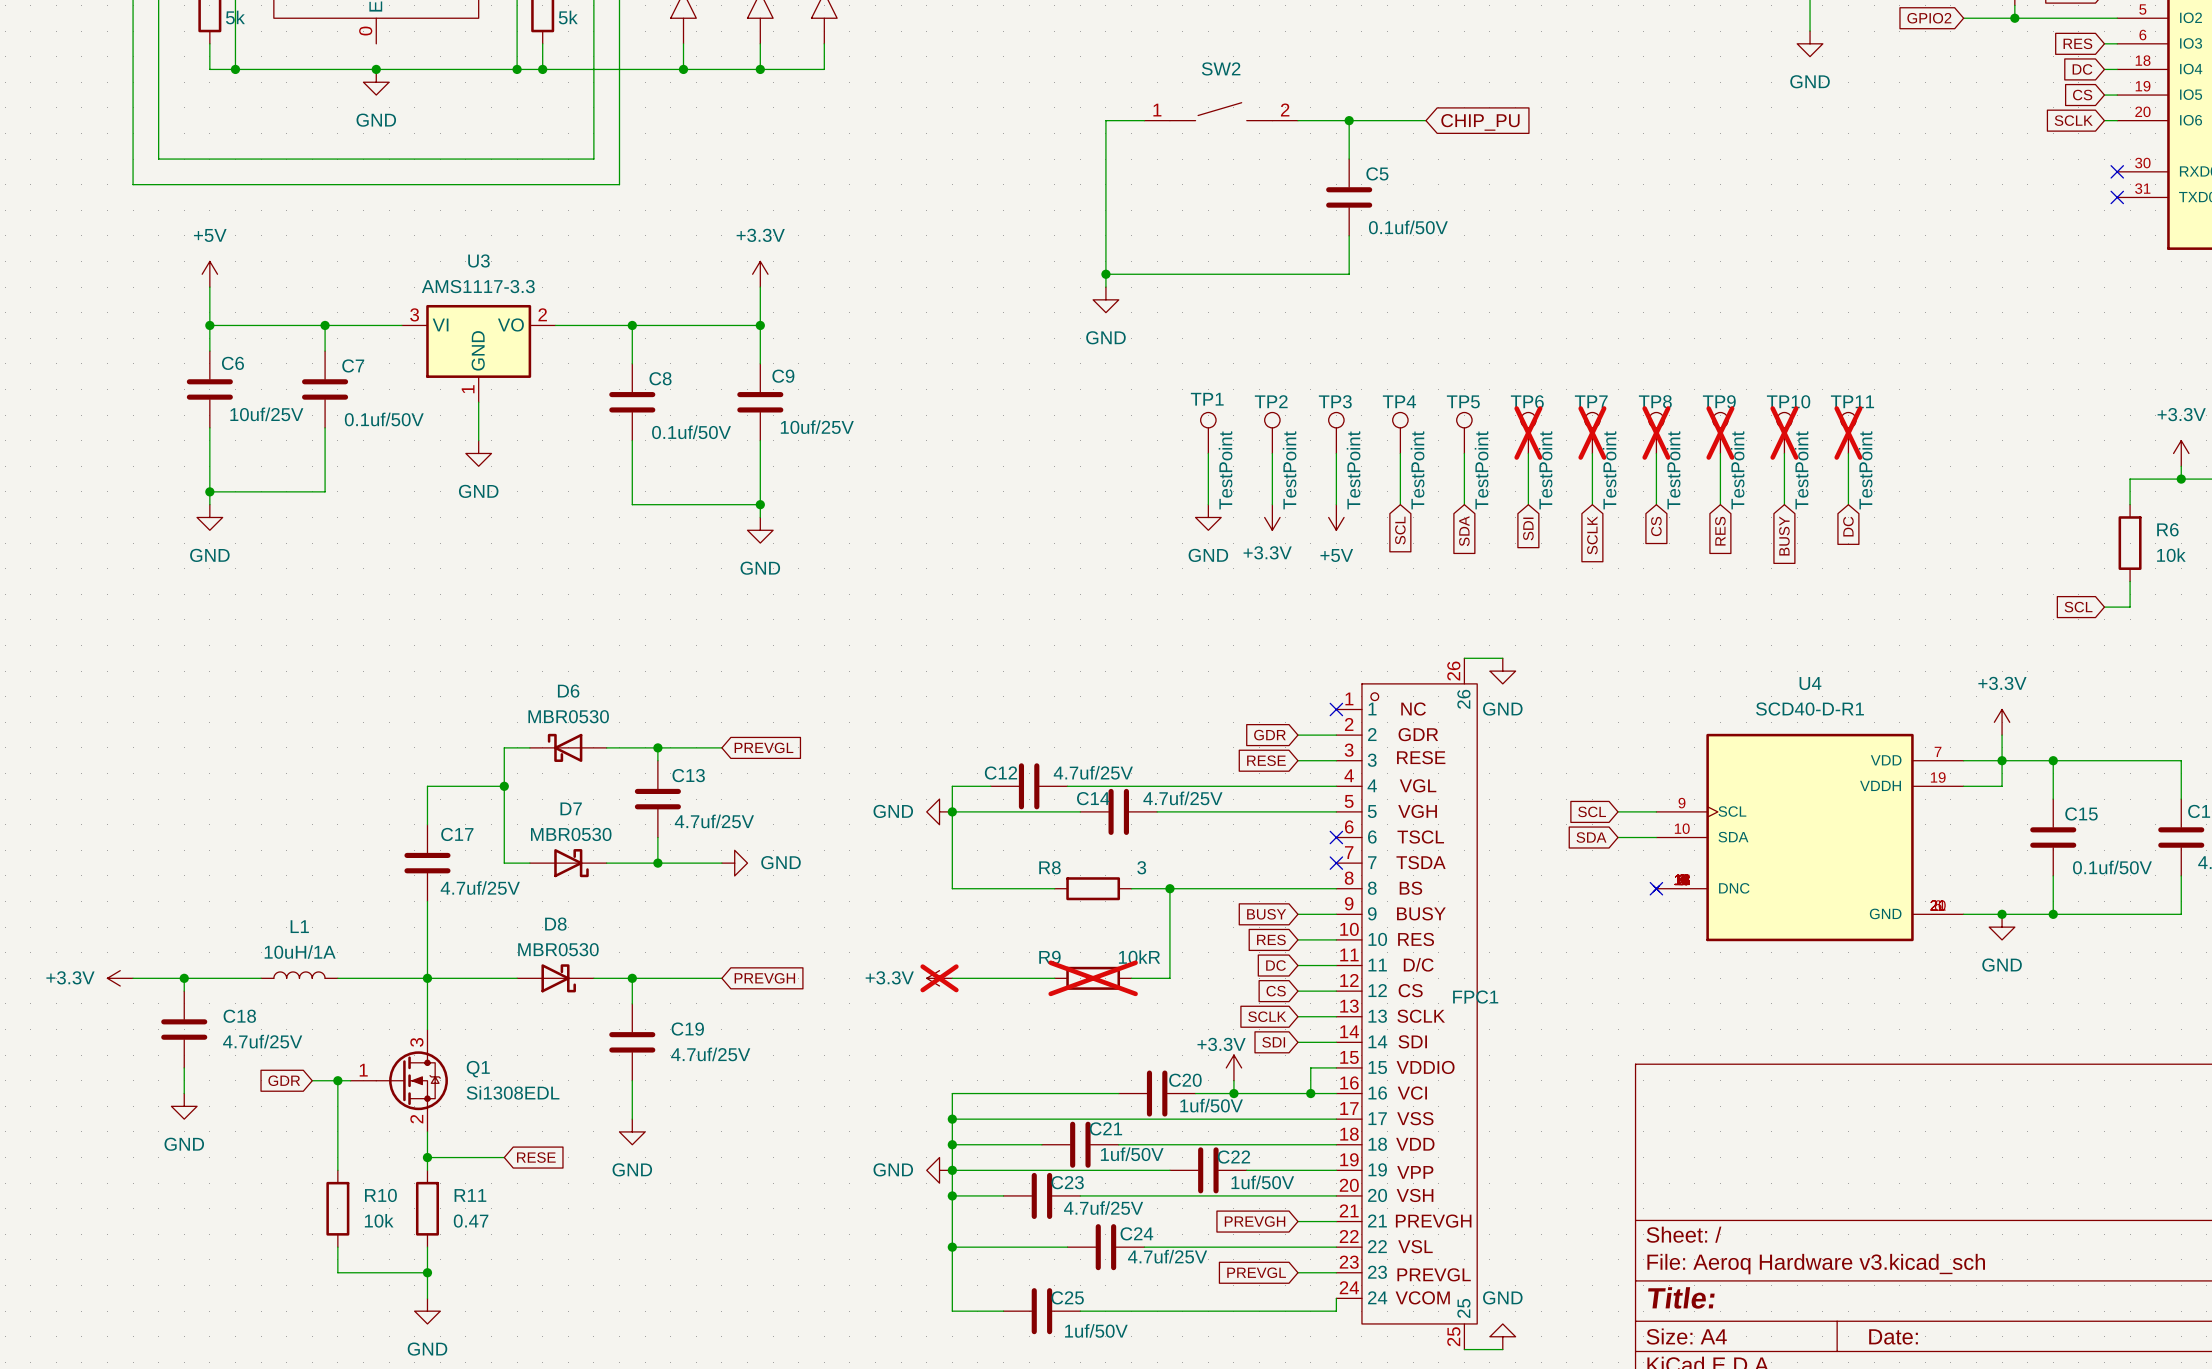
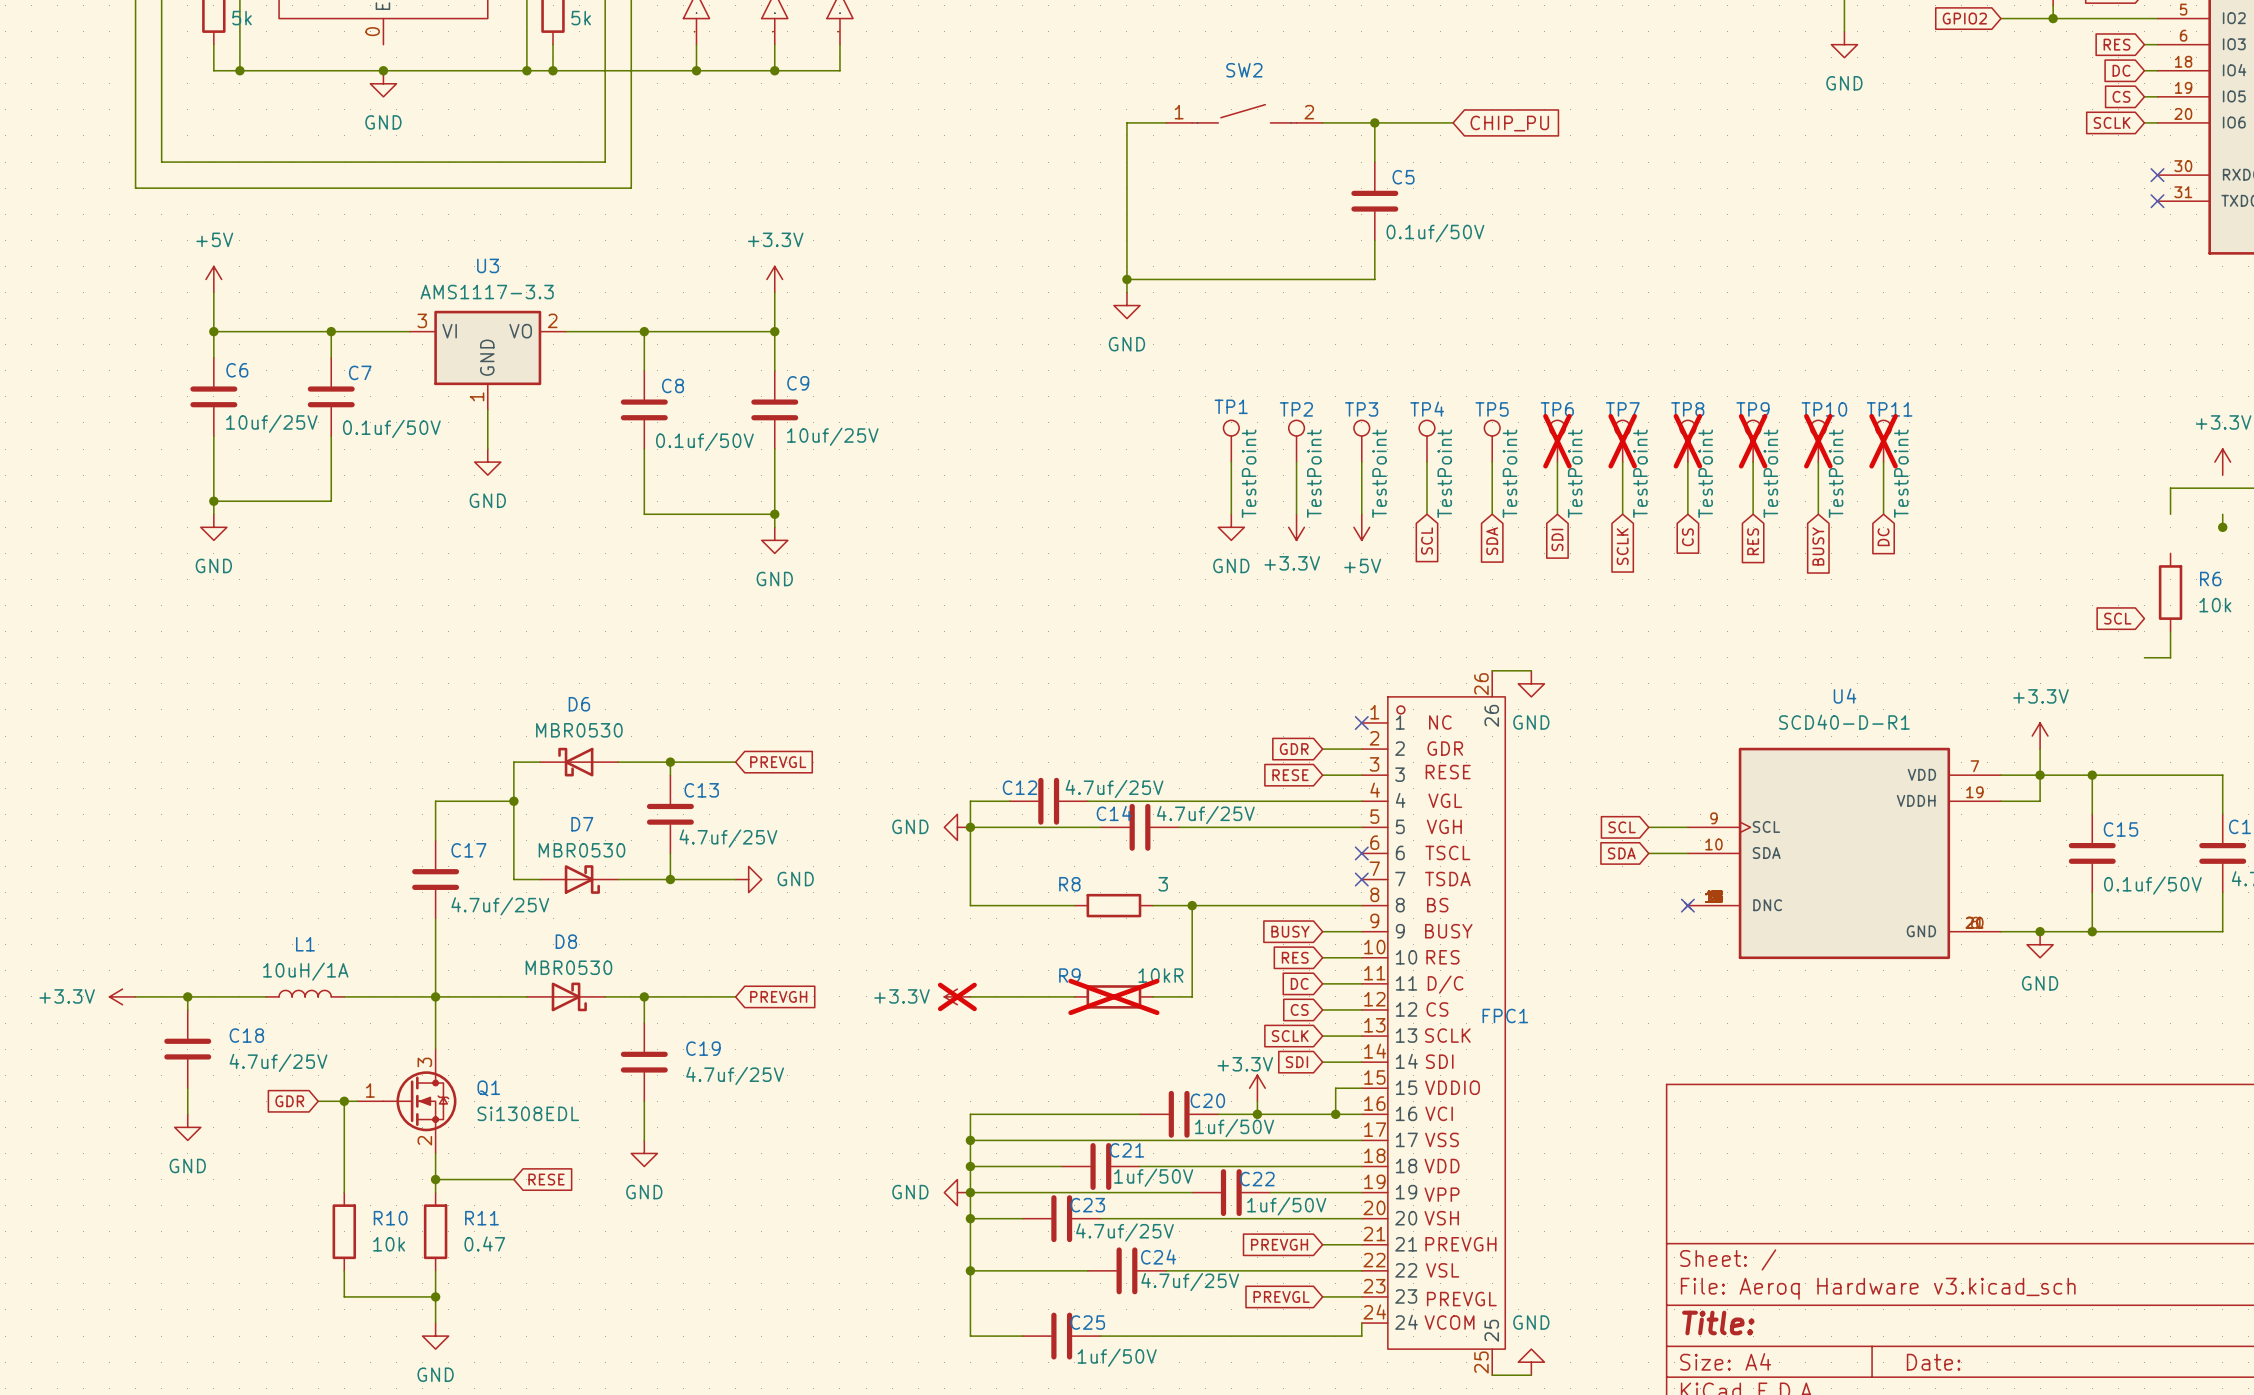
wire: (2181, 466) (2181, 479) -> (2222, 514) (2222, 527)
junction position: (2181, 479) -> (2222, 527)
R6 position: (2130, 543) -> (2170, 592)
wire: (2130, 581) (2130, 607) (2104, 607) -> (2170, 631) (2170, 657) (2144, 657)

